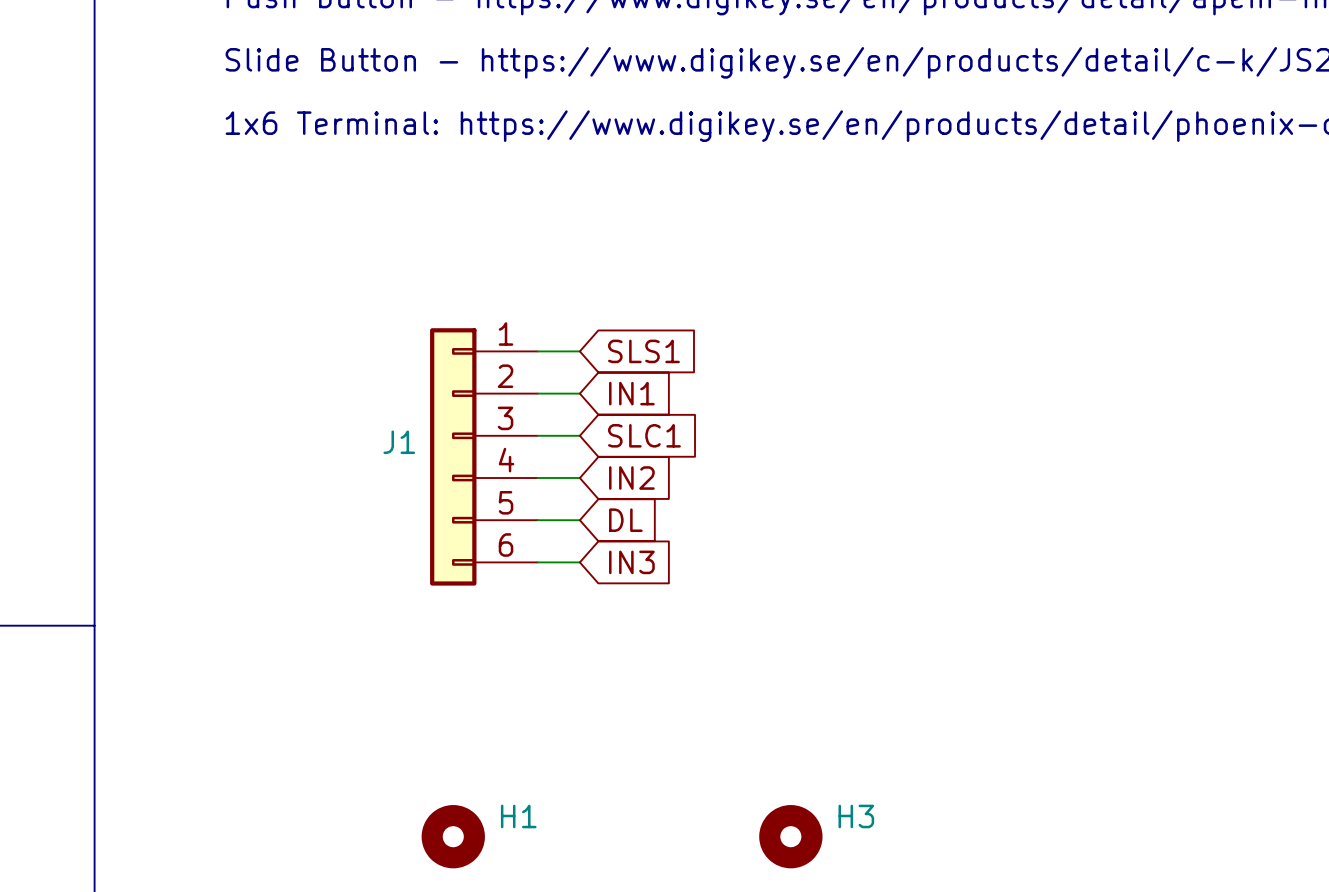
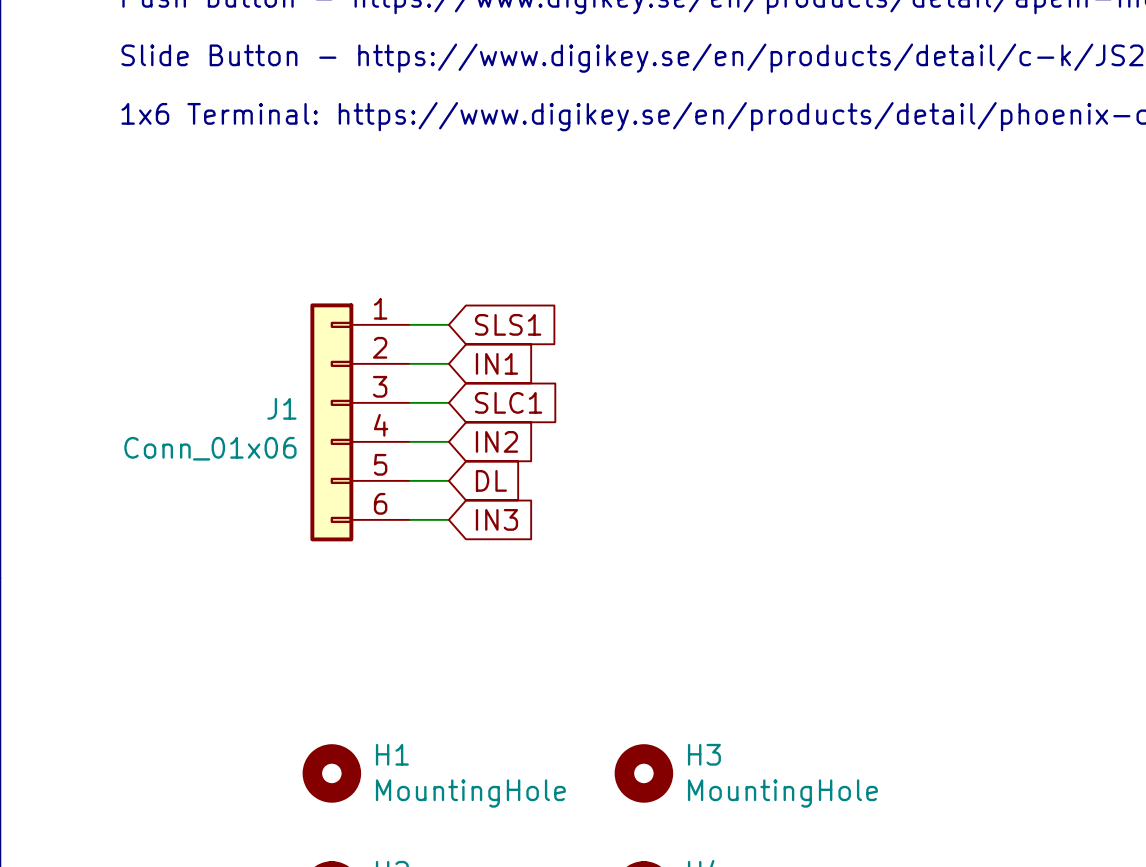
J1 value: none -> Conn_01x06 (210, 448)
H1 value: none -> MountingHole (470, 793)
H3 value: none -> MountingHole (782, 793)

